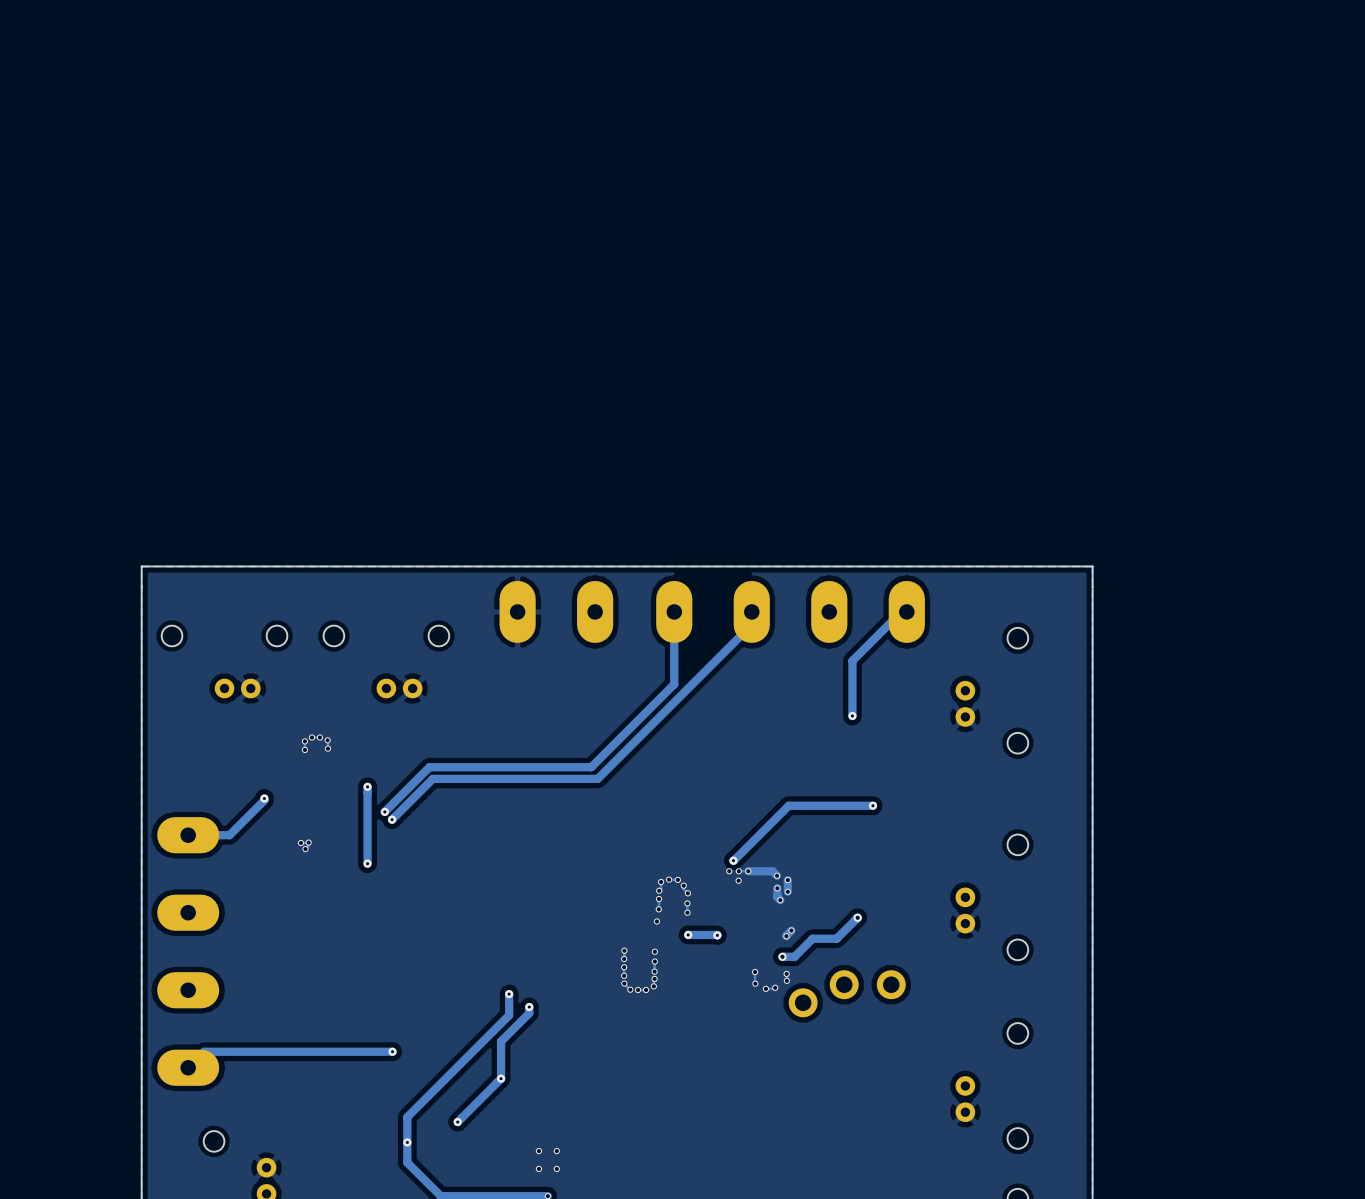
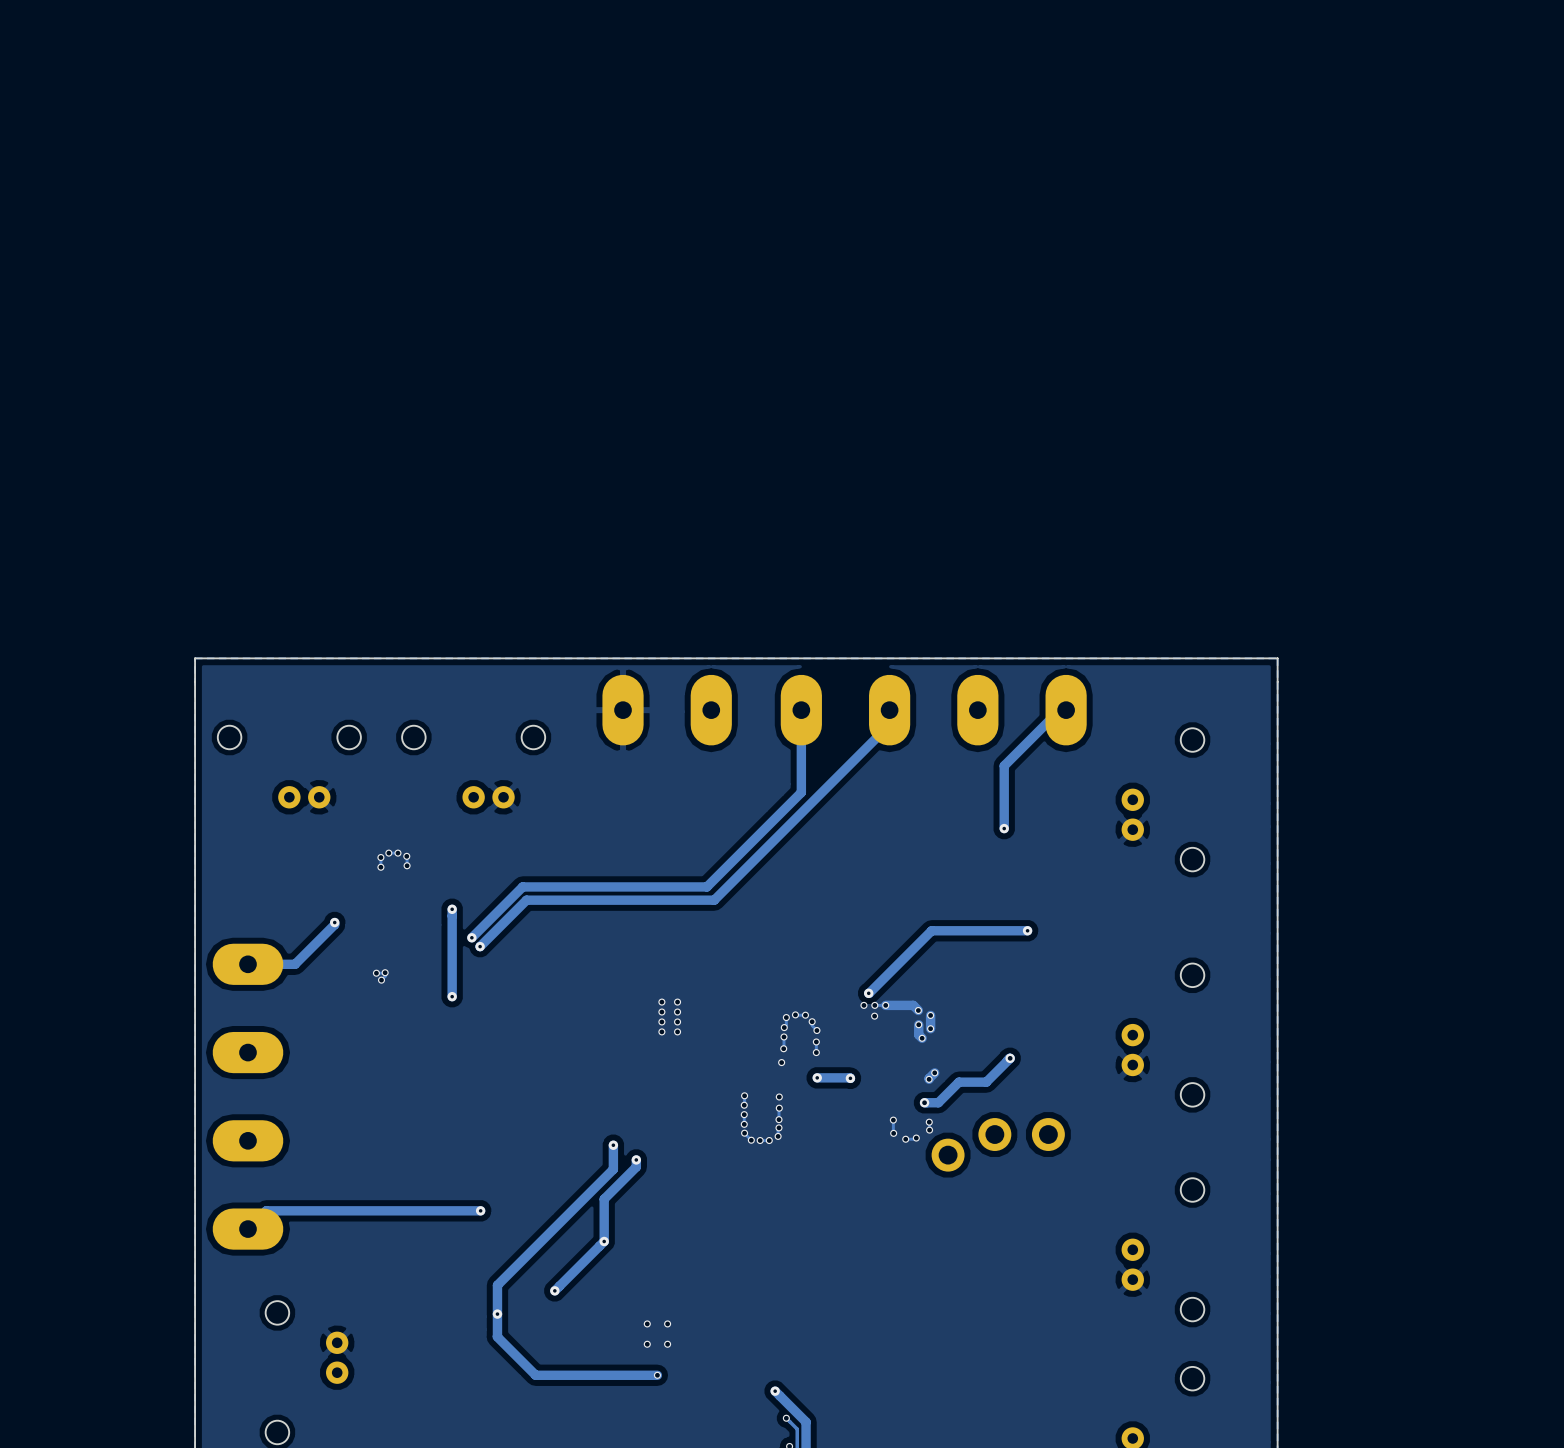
via: none -> (661, 1002)
via: none -> (677, 1002)
via: none -> (661, 1012)
via: none -> (677, 1012)
via: none -> (661, 1021)
via: none -> (677, 1021)
via: none -> (661, 1031)
via: none -> (677, 1031)

